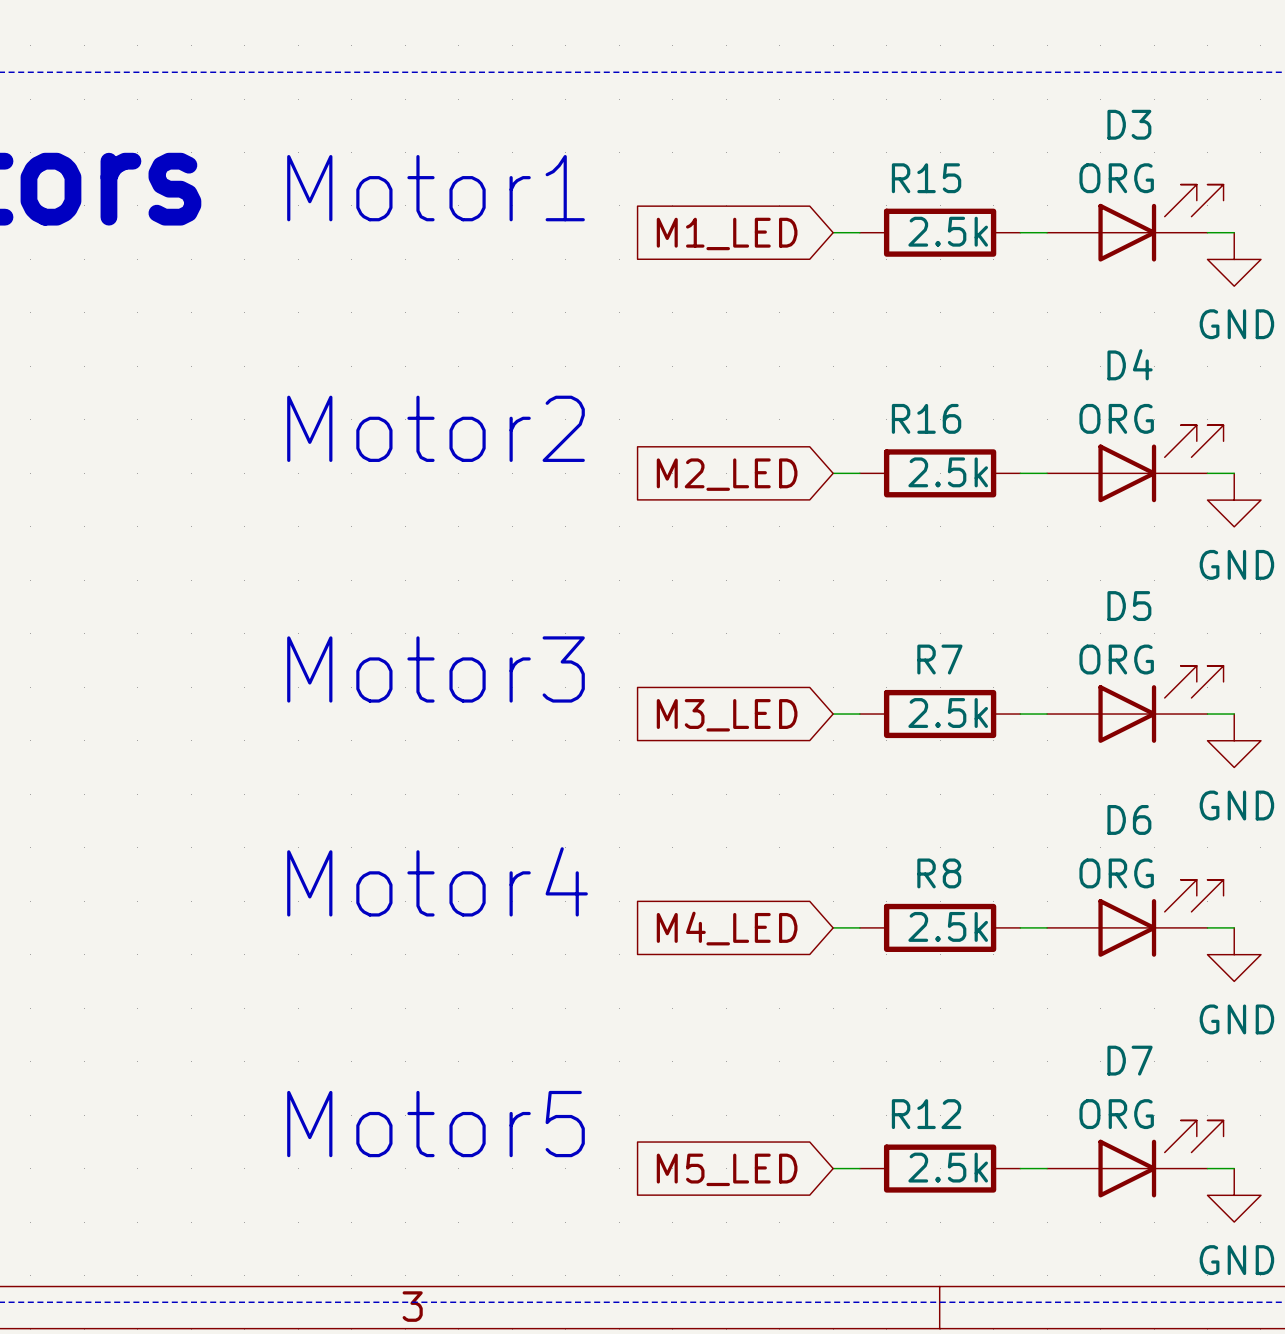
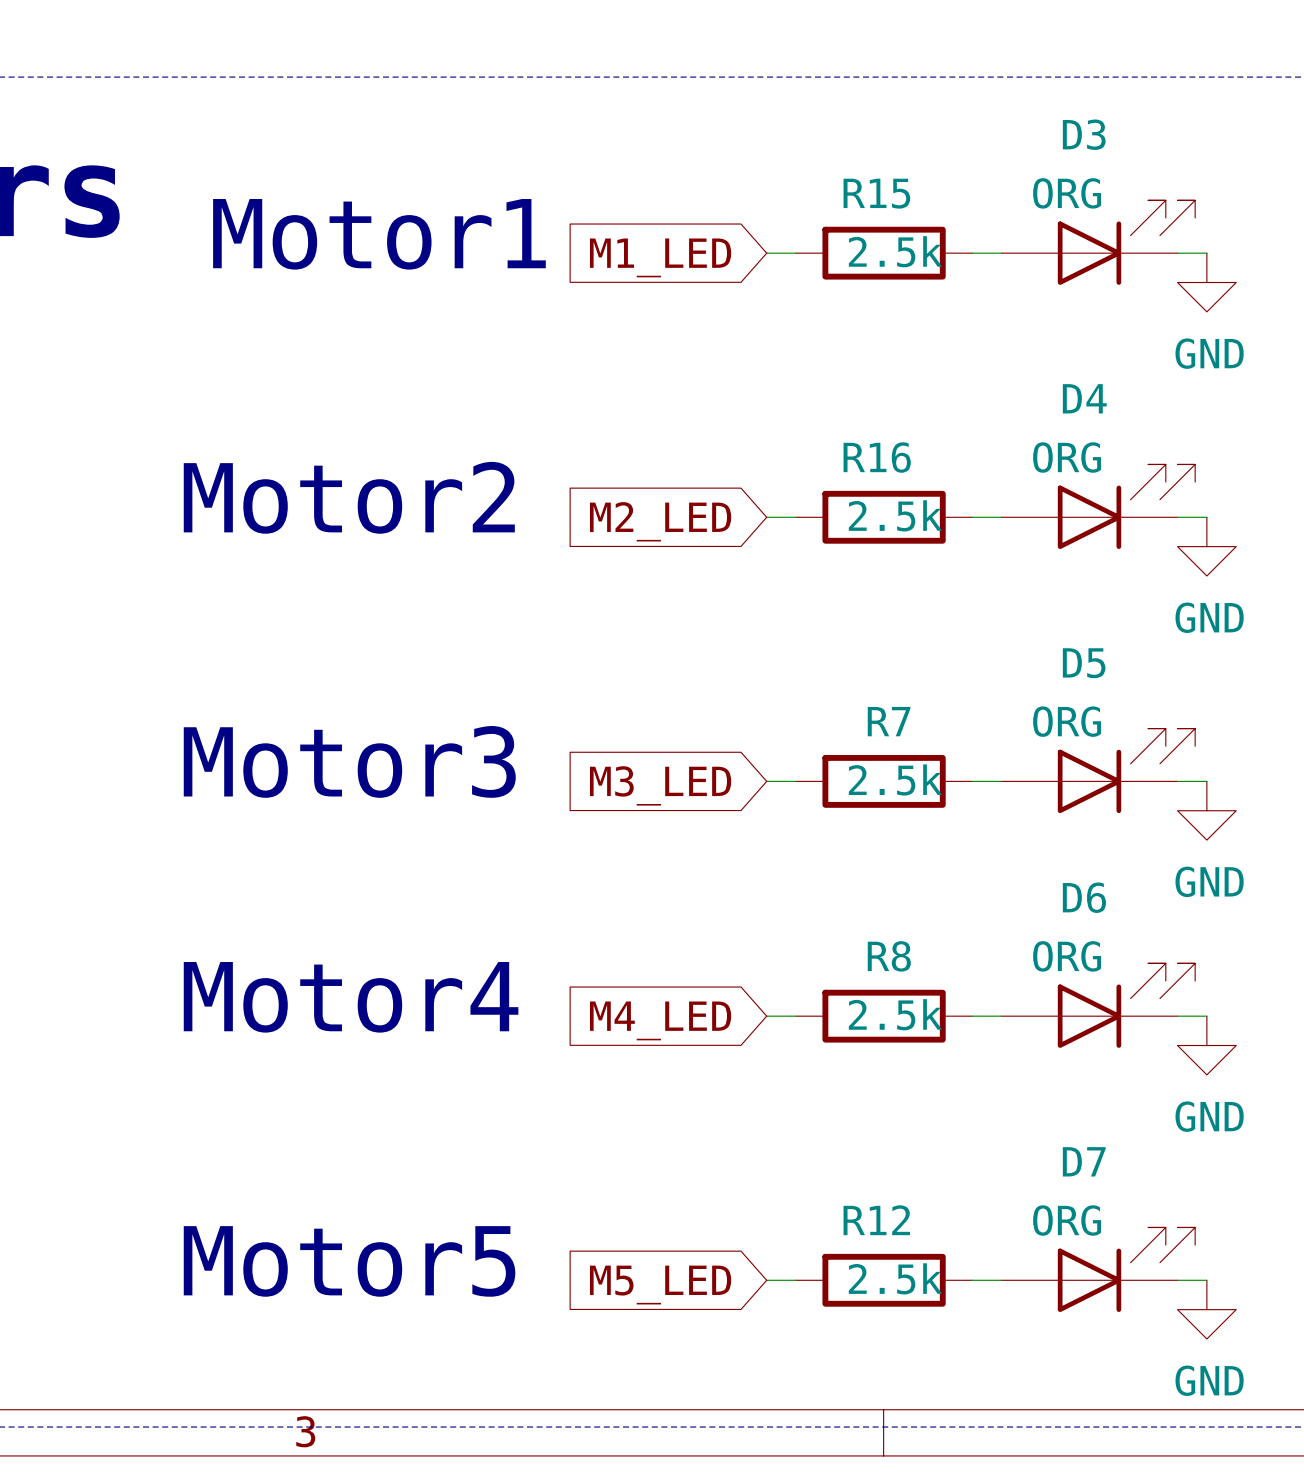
text position: Motor1 (436, 188) -> Motor1 (379, 234)
text position: Motor2 (436, 428) -> Motor2 (349, 497)
text position: Motor3 (436, 669) -> Motor3 (349, 761)
text position: Motor4 (437, 881) -> Motor4 (351, 997)
text position: Motor5 (436, 1124) -> Motor5 (349, 1261)

